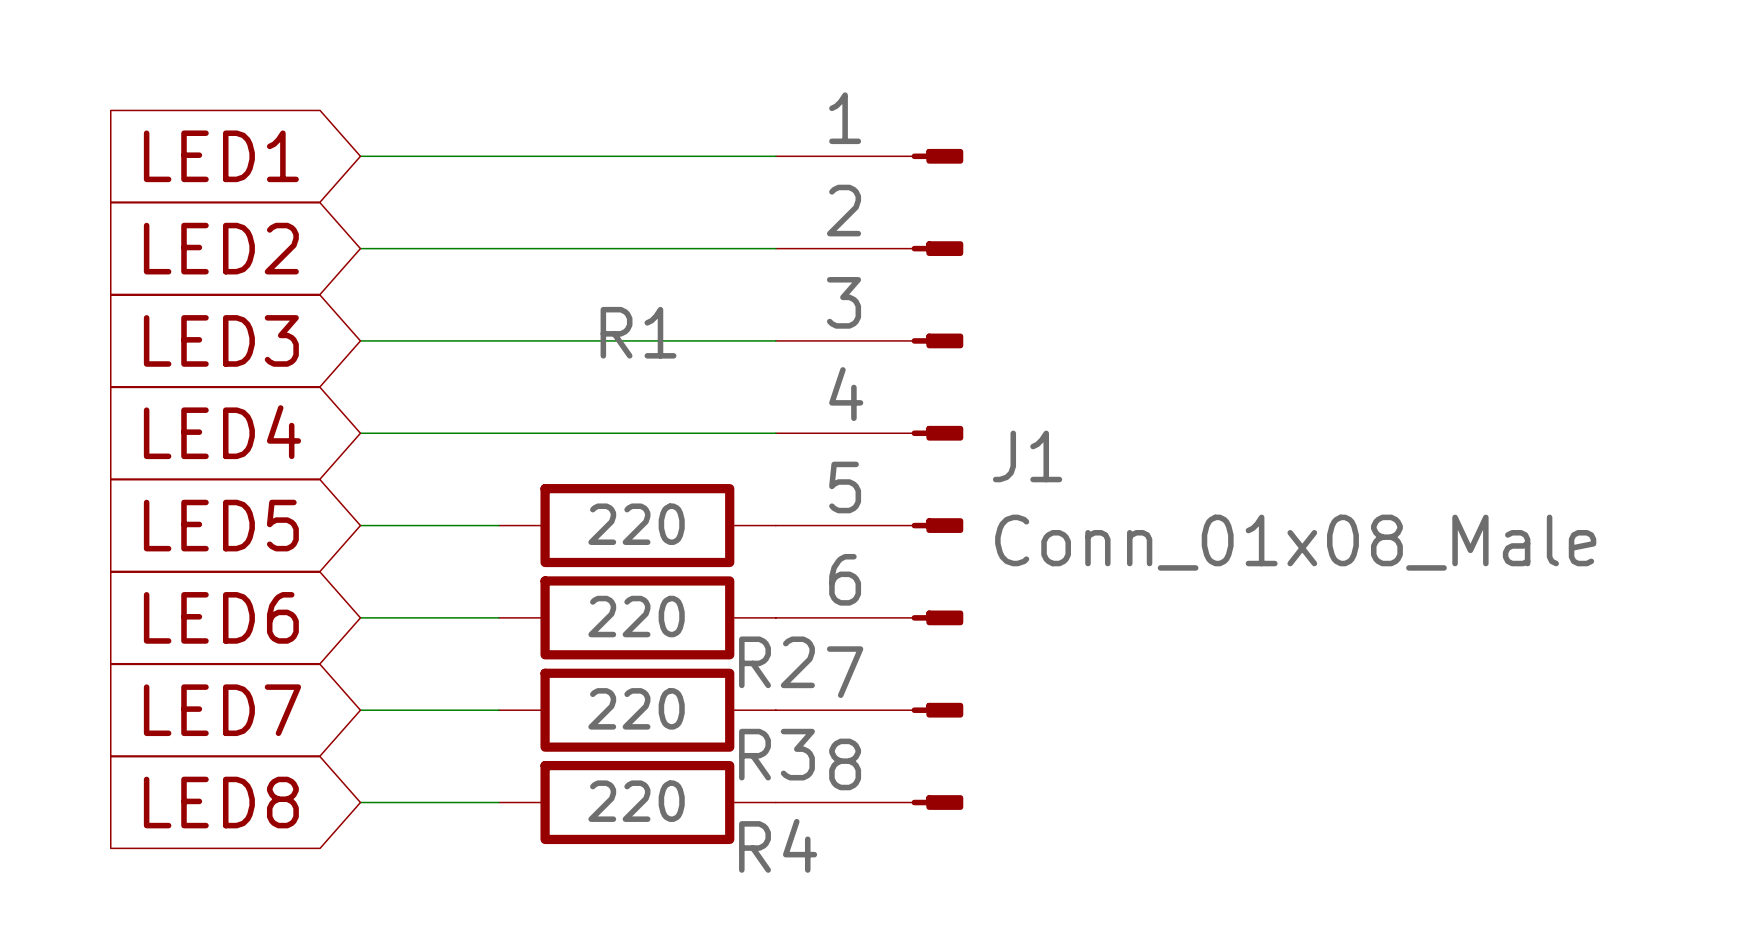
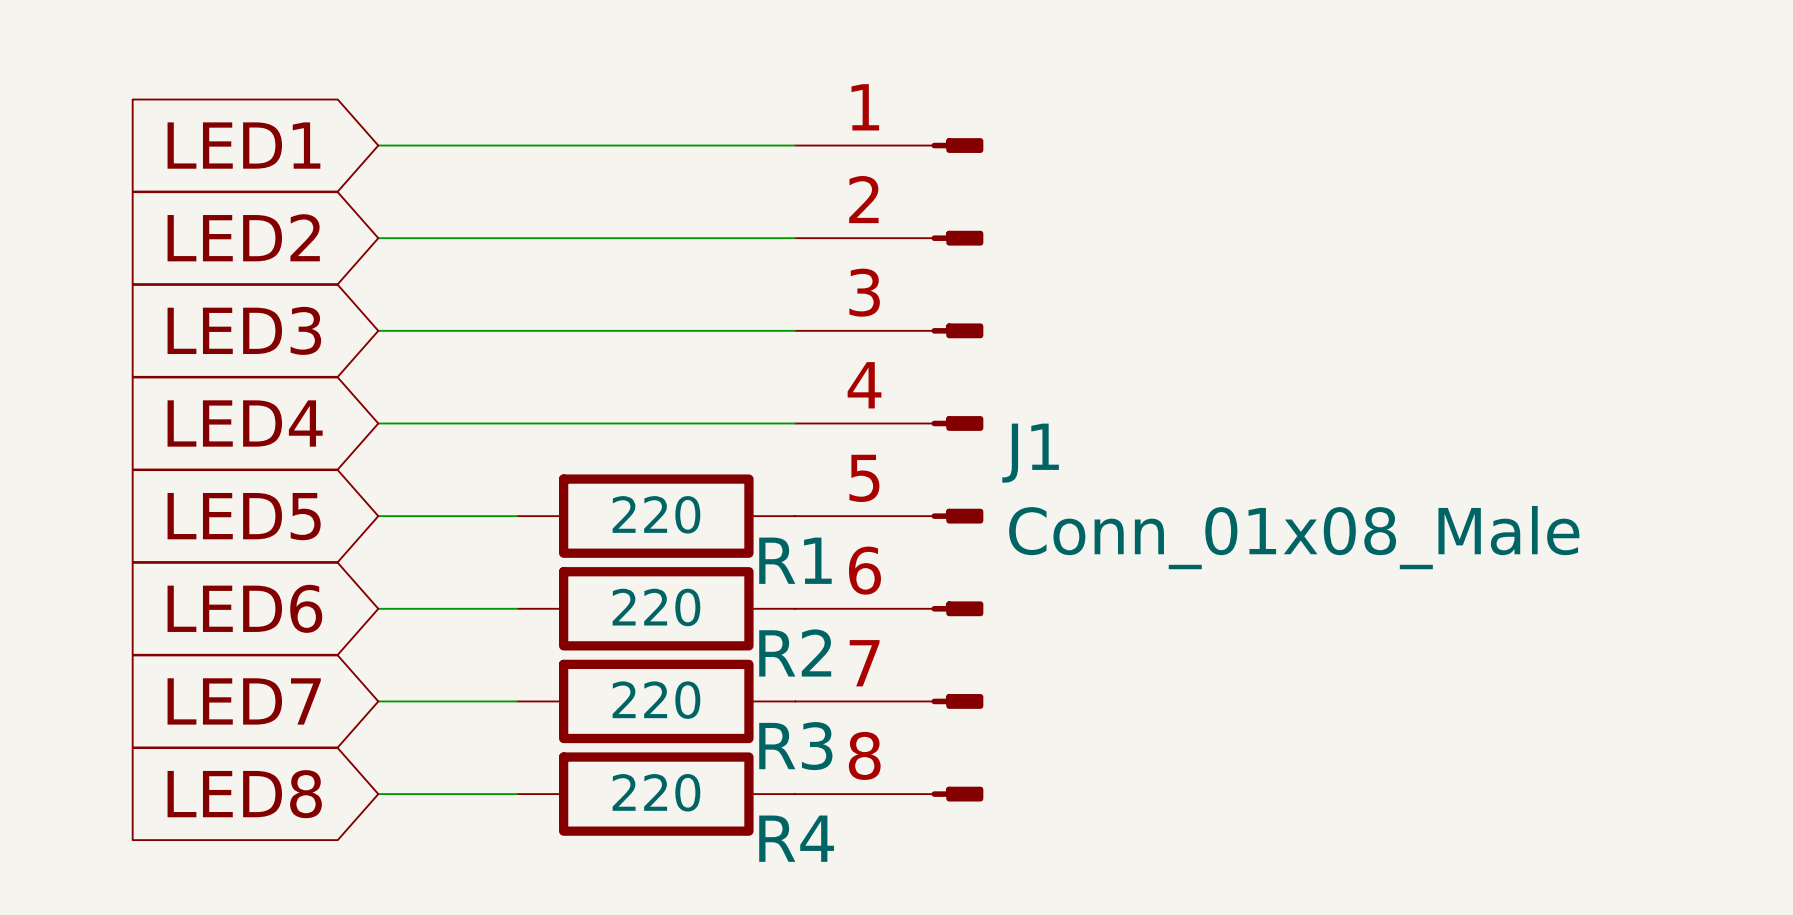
R1 name position: R1 (638, 332) -> R1 (795, 560)

